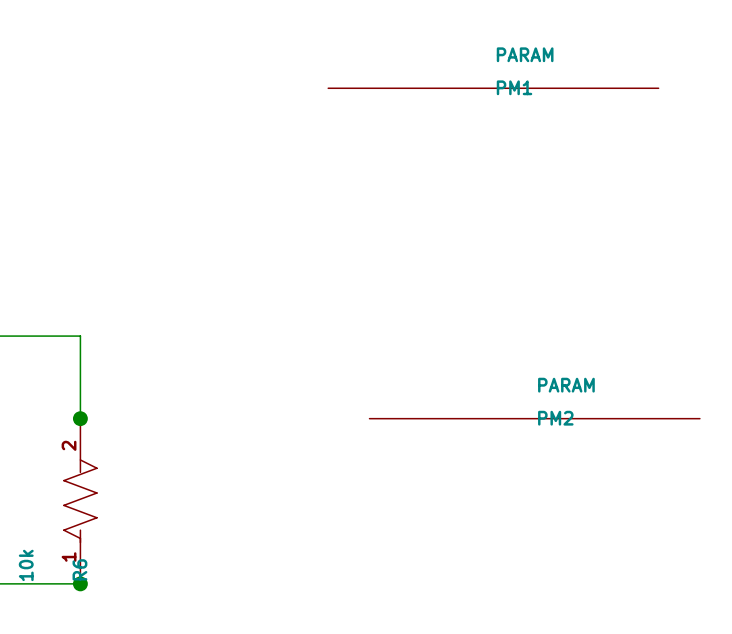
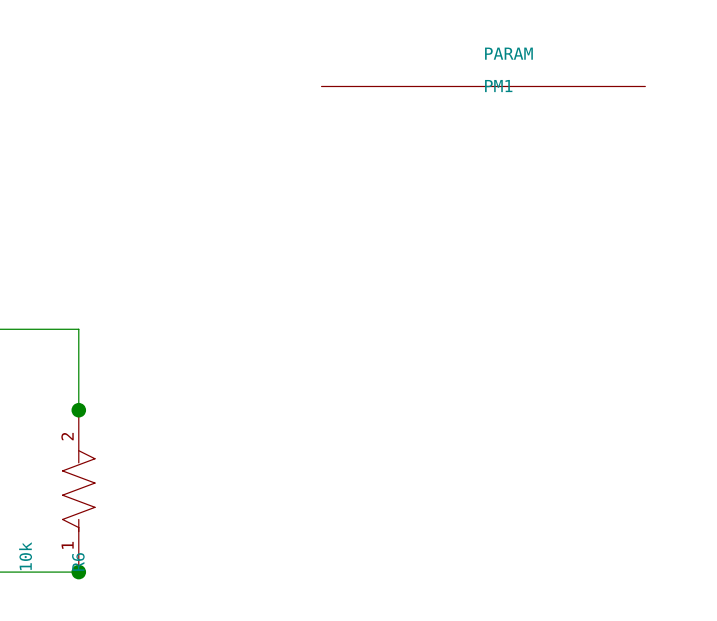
PM2: PARAM (534, 418) -> none

